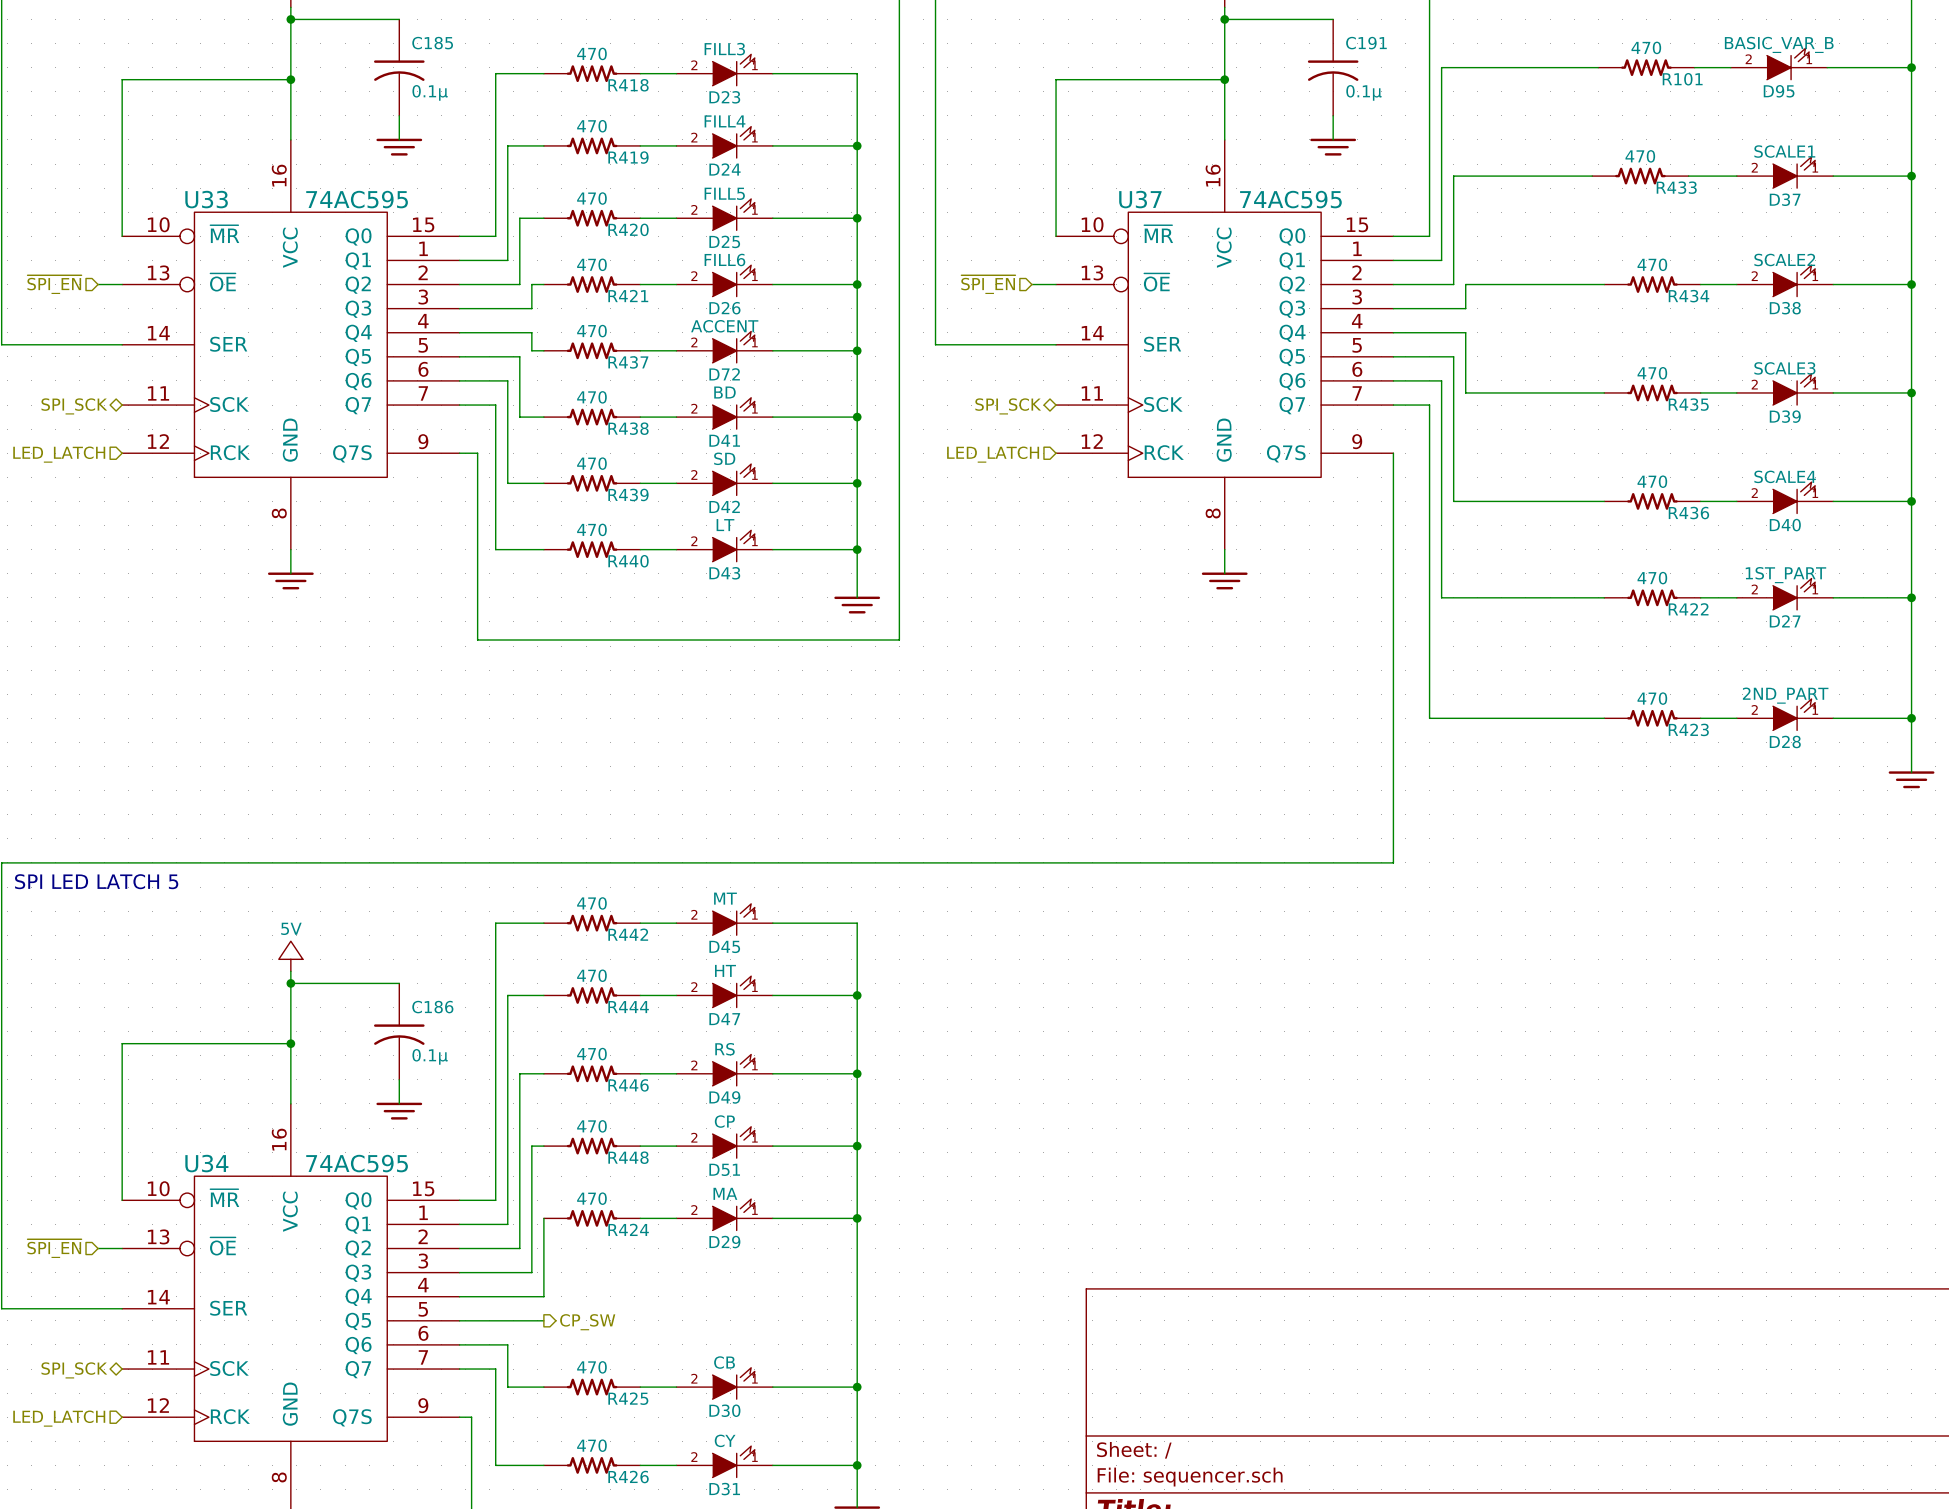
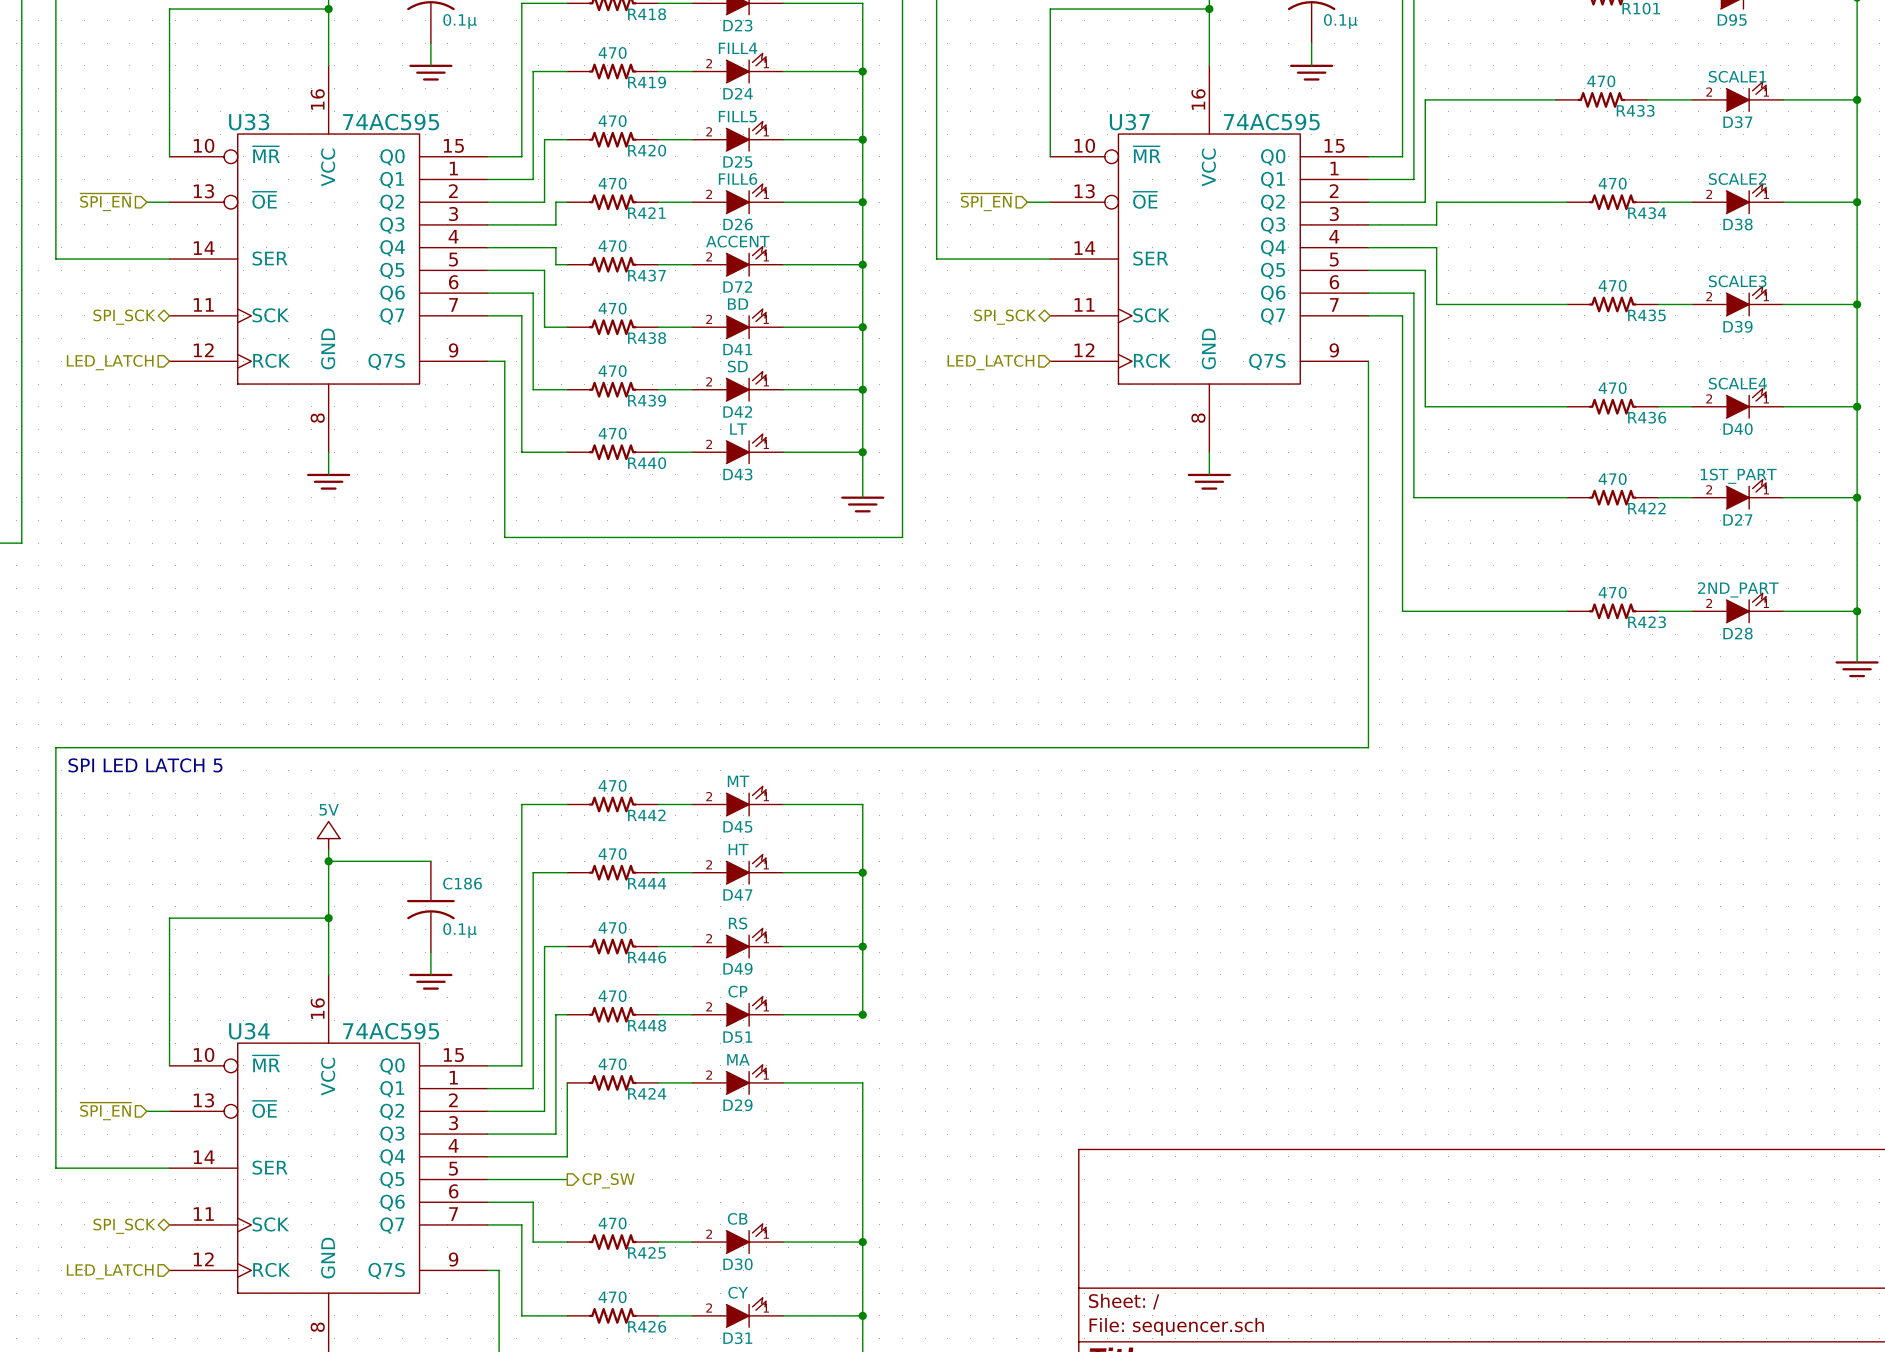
wire: (857, 1146) (857, 1218) -> none
junction: (857, 1218) -> none

